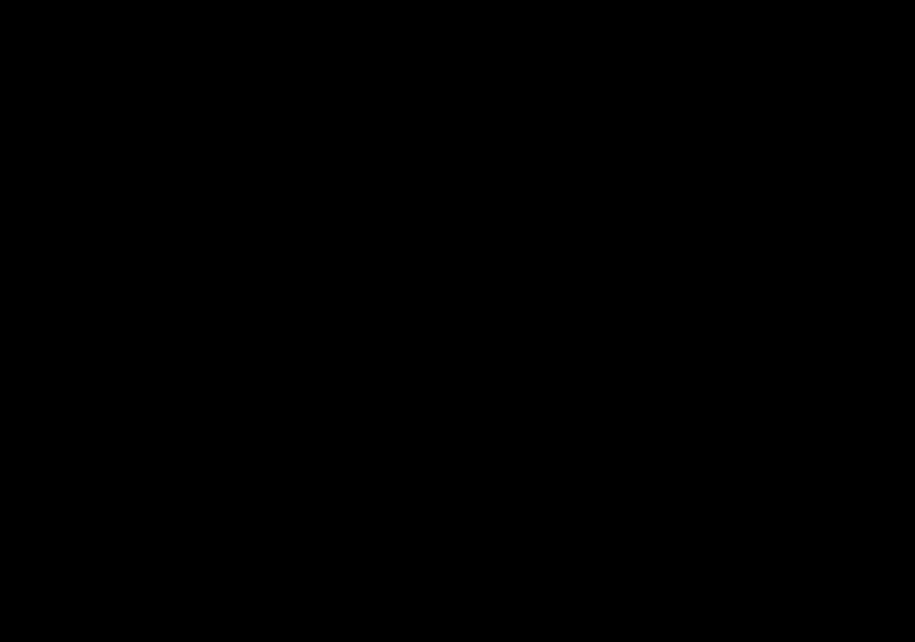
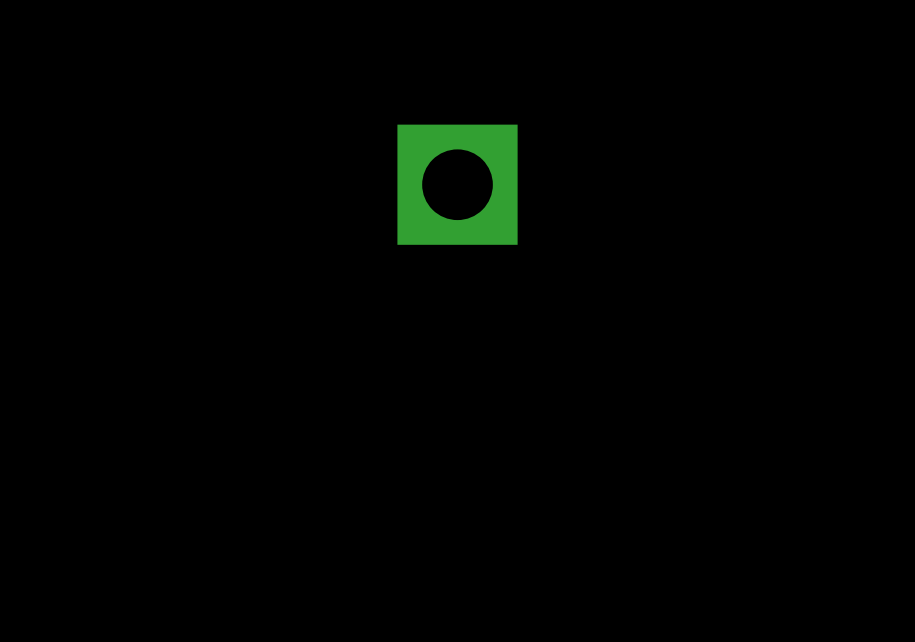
part: none -> (457, 184)

